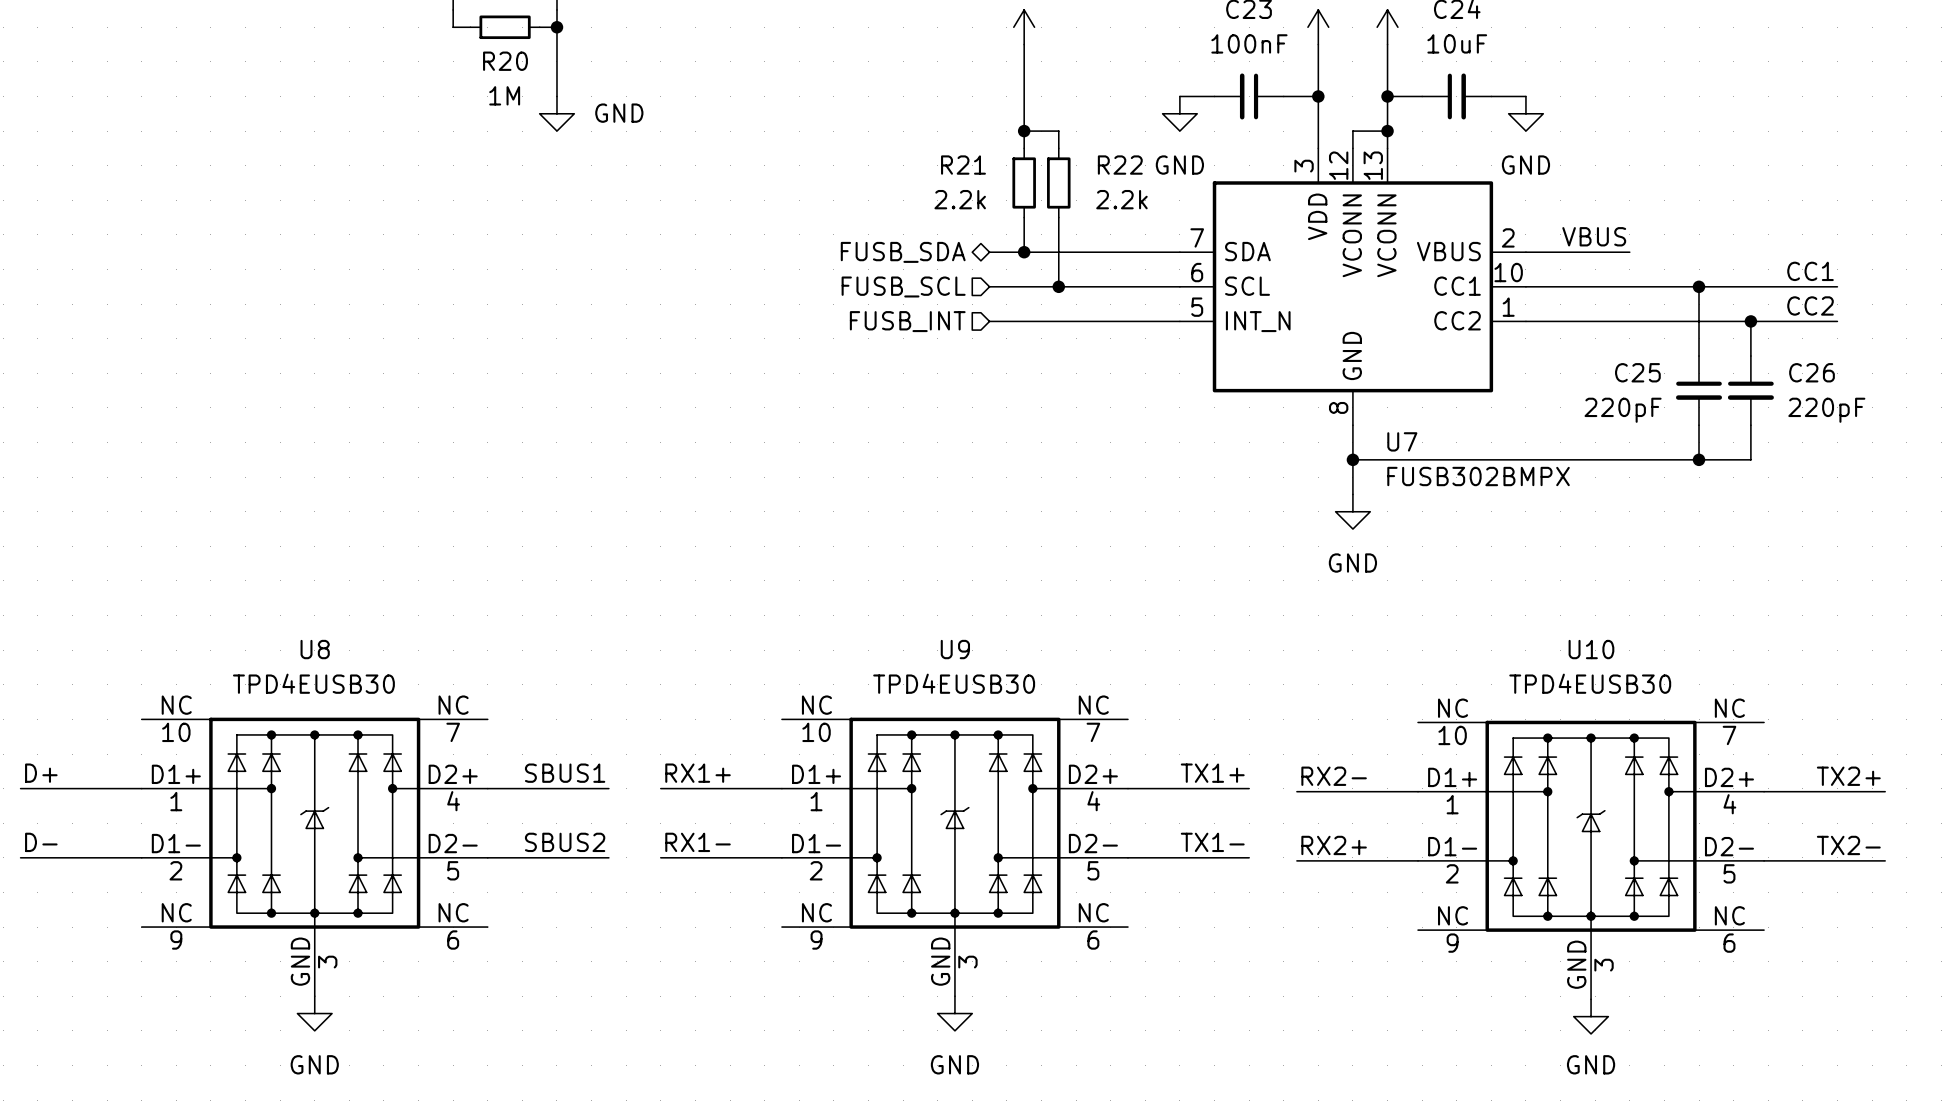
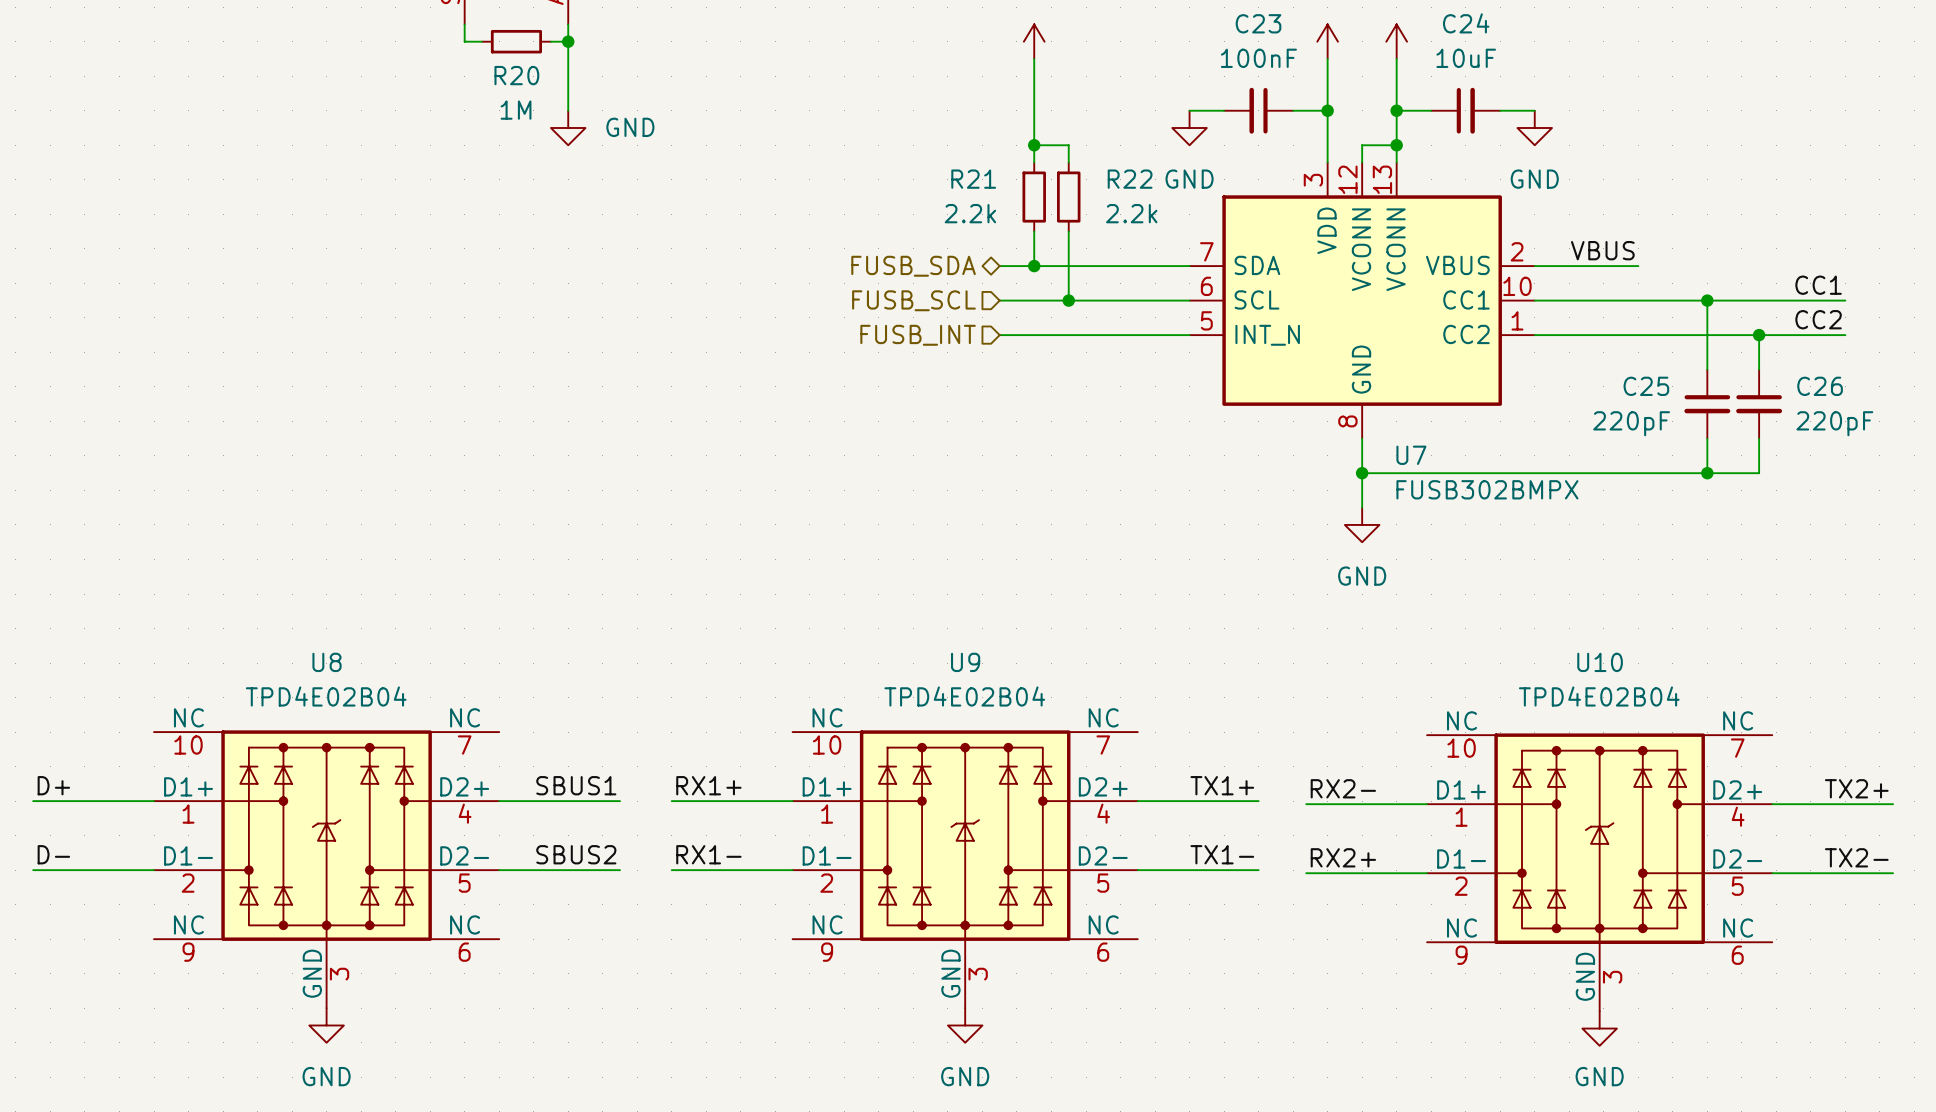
U8 value: TPD4EUSB30 (313, 683) -> TPD4E02B04 (326, 696)
U9 value: TPD4EUSB30 (954, 683) -> TPD4E02B04 (964, 696)
U10 value: TPD4EUSB30 (1590, 683) -> TPD4E02B04 (1599, 696)

